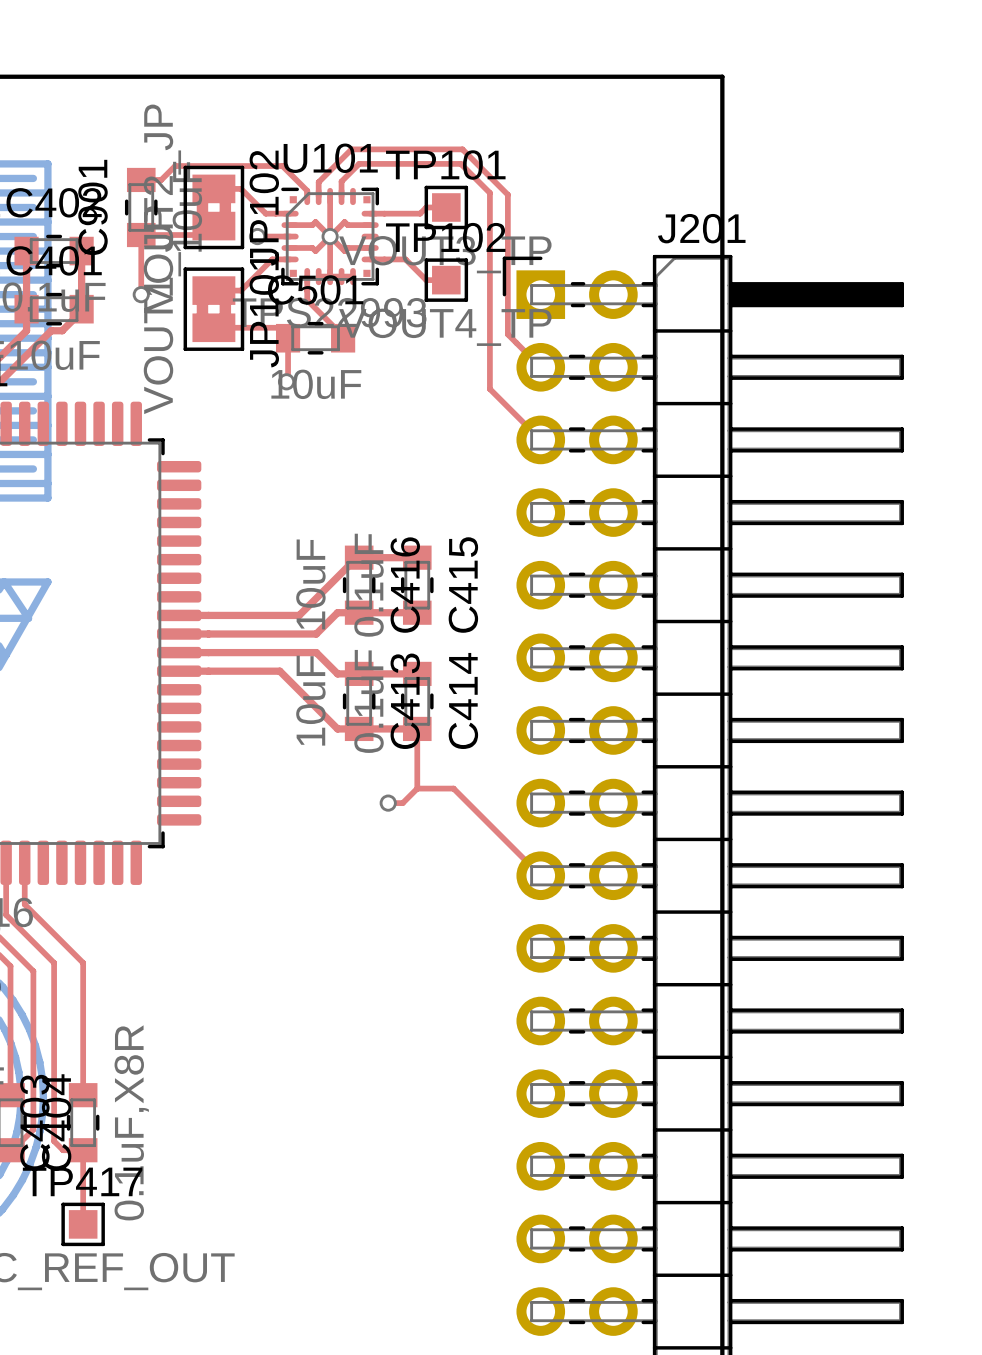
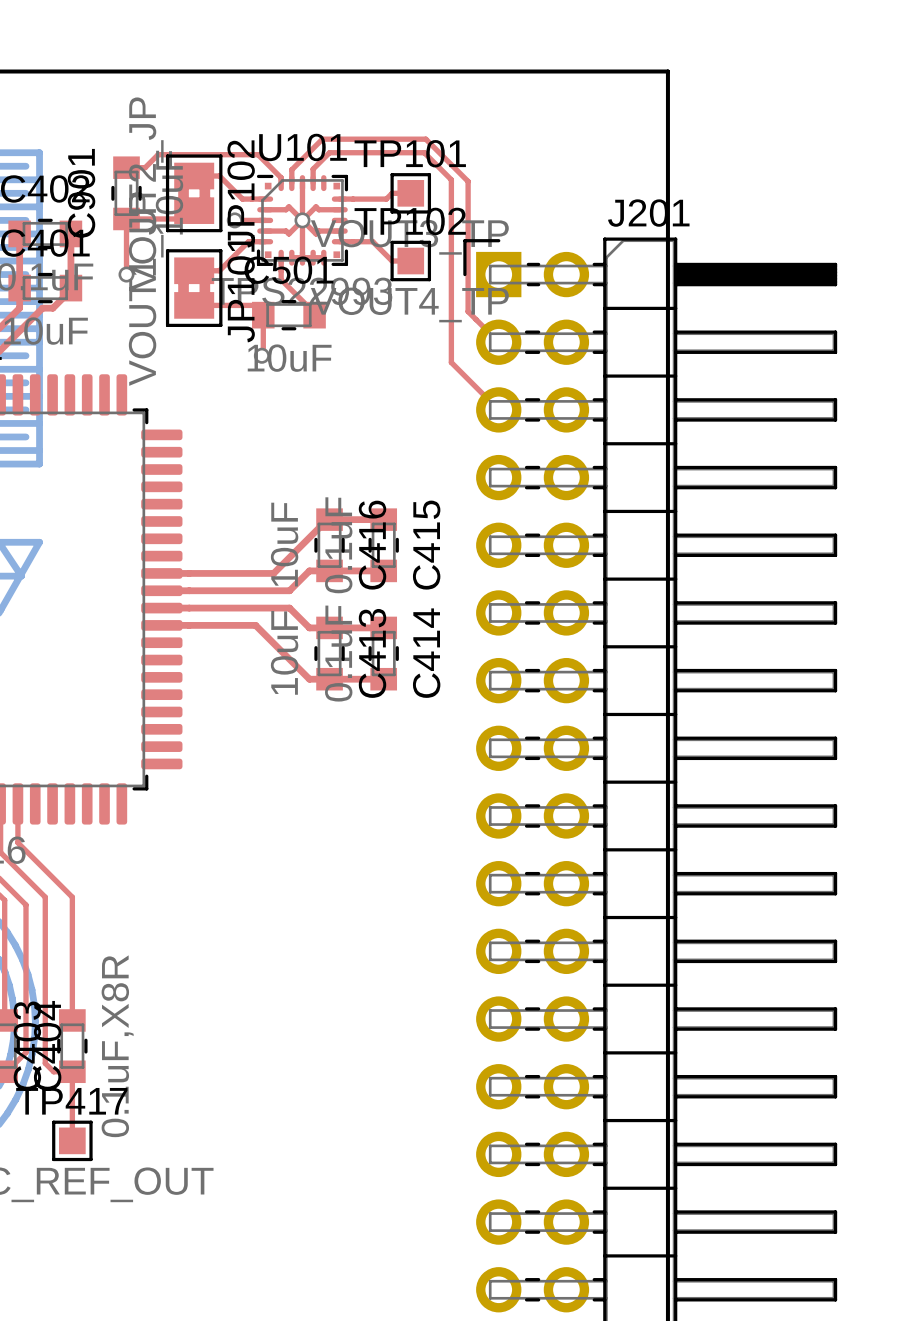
top track: (417, 728) (417, 788) -> none
top track: (417, 788) (402, 803) (388, 803) -> none
top track: (417, 788) (453, 788) (540, 875) -> none
via: (388, 803) -> none

